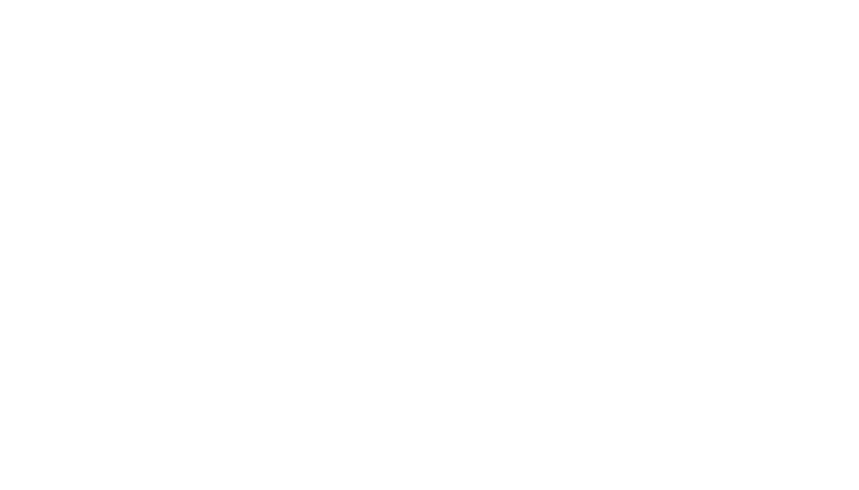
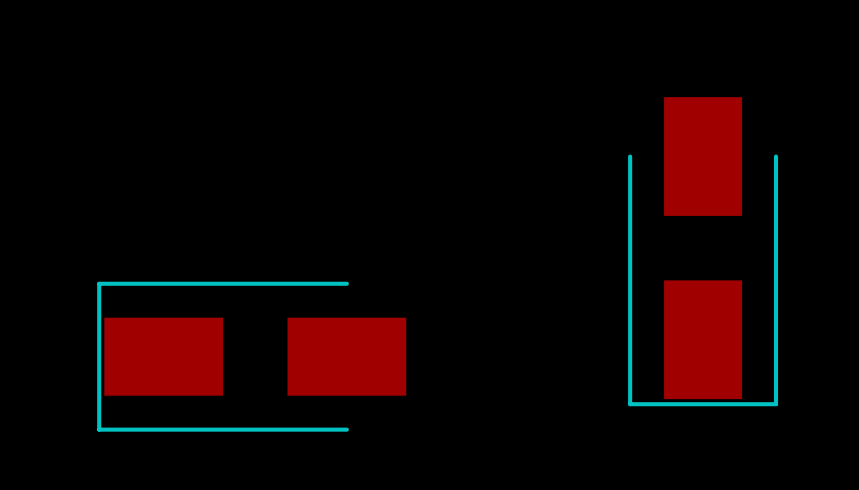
part: none -> (703, 251)
part: none -> (251, 356)

